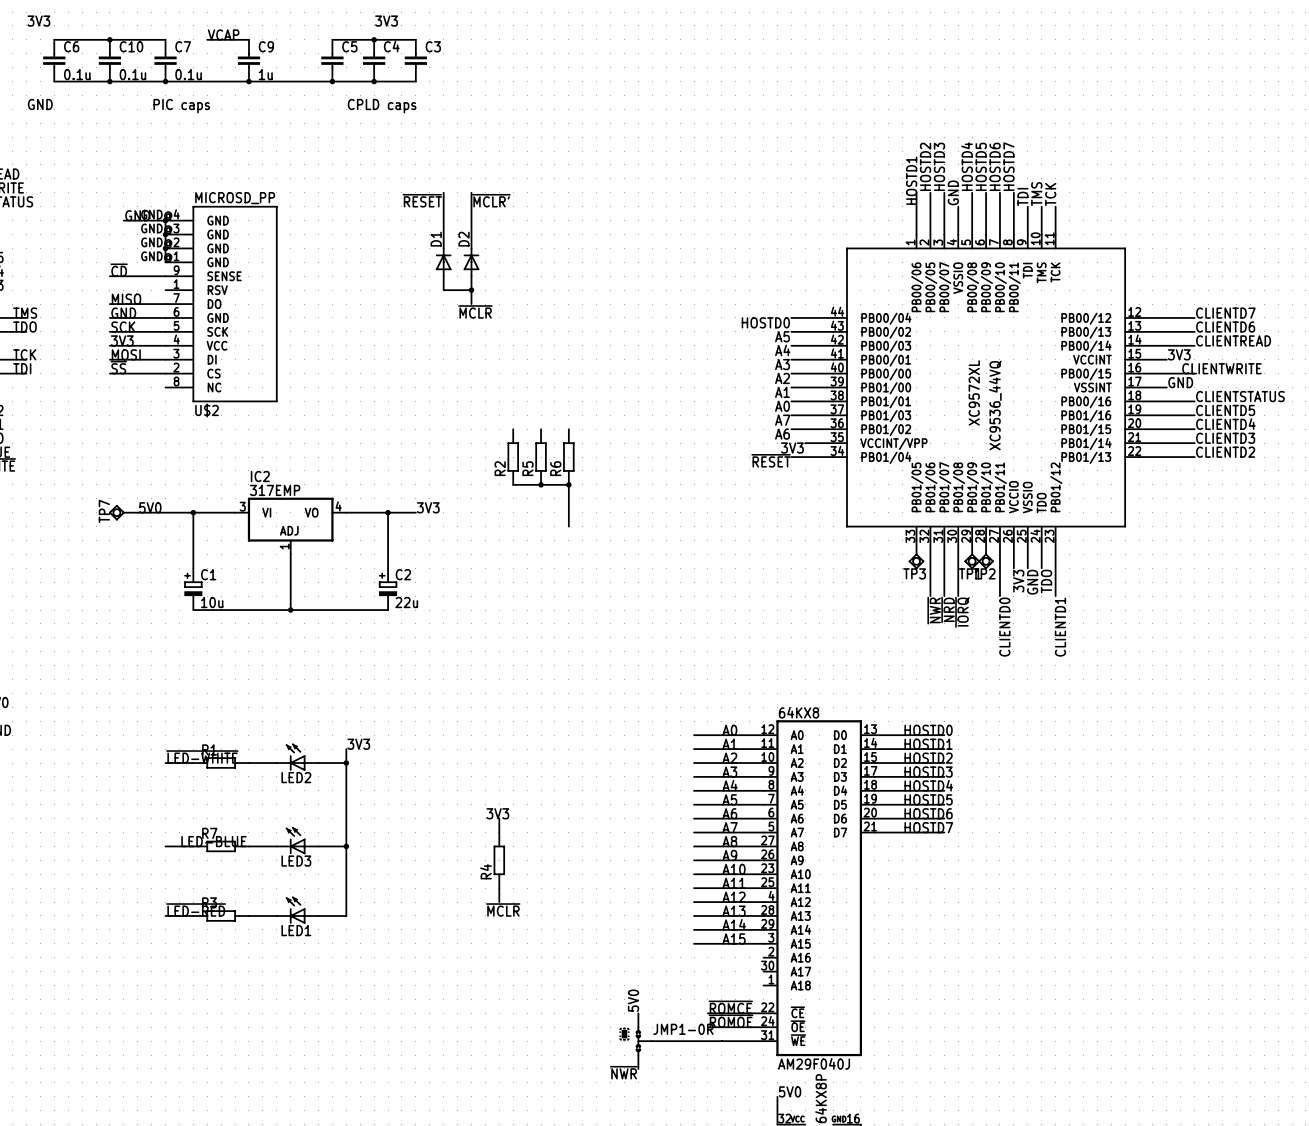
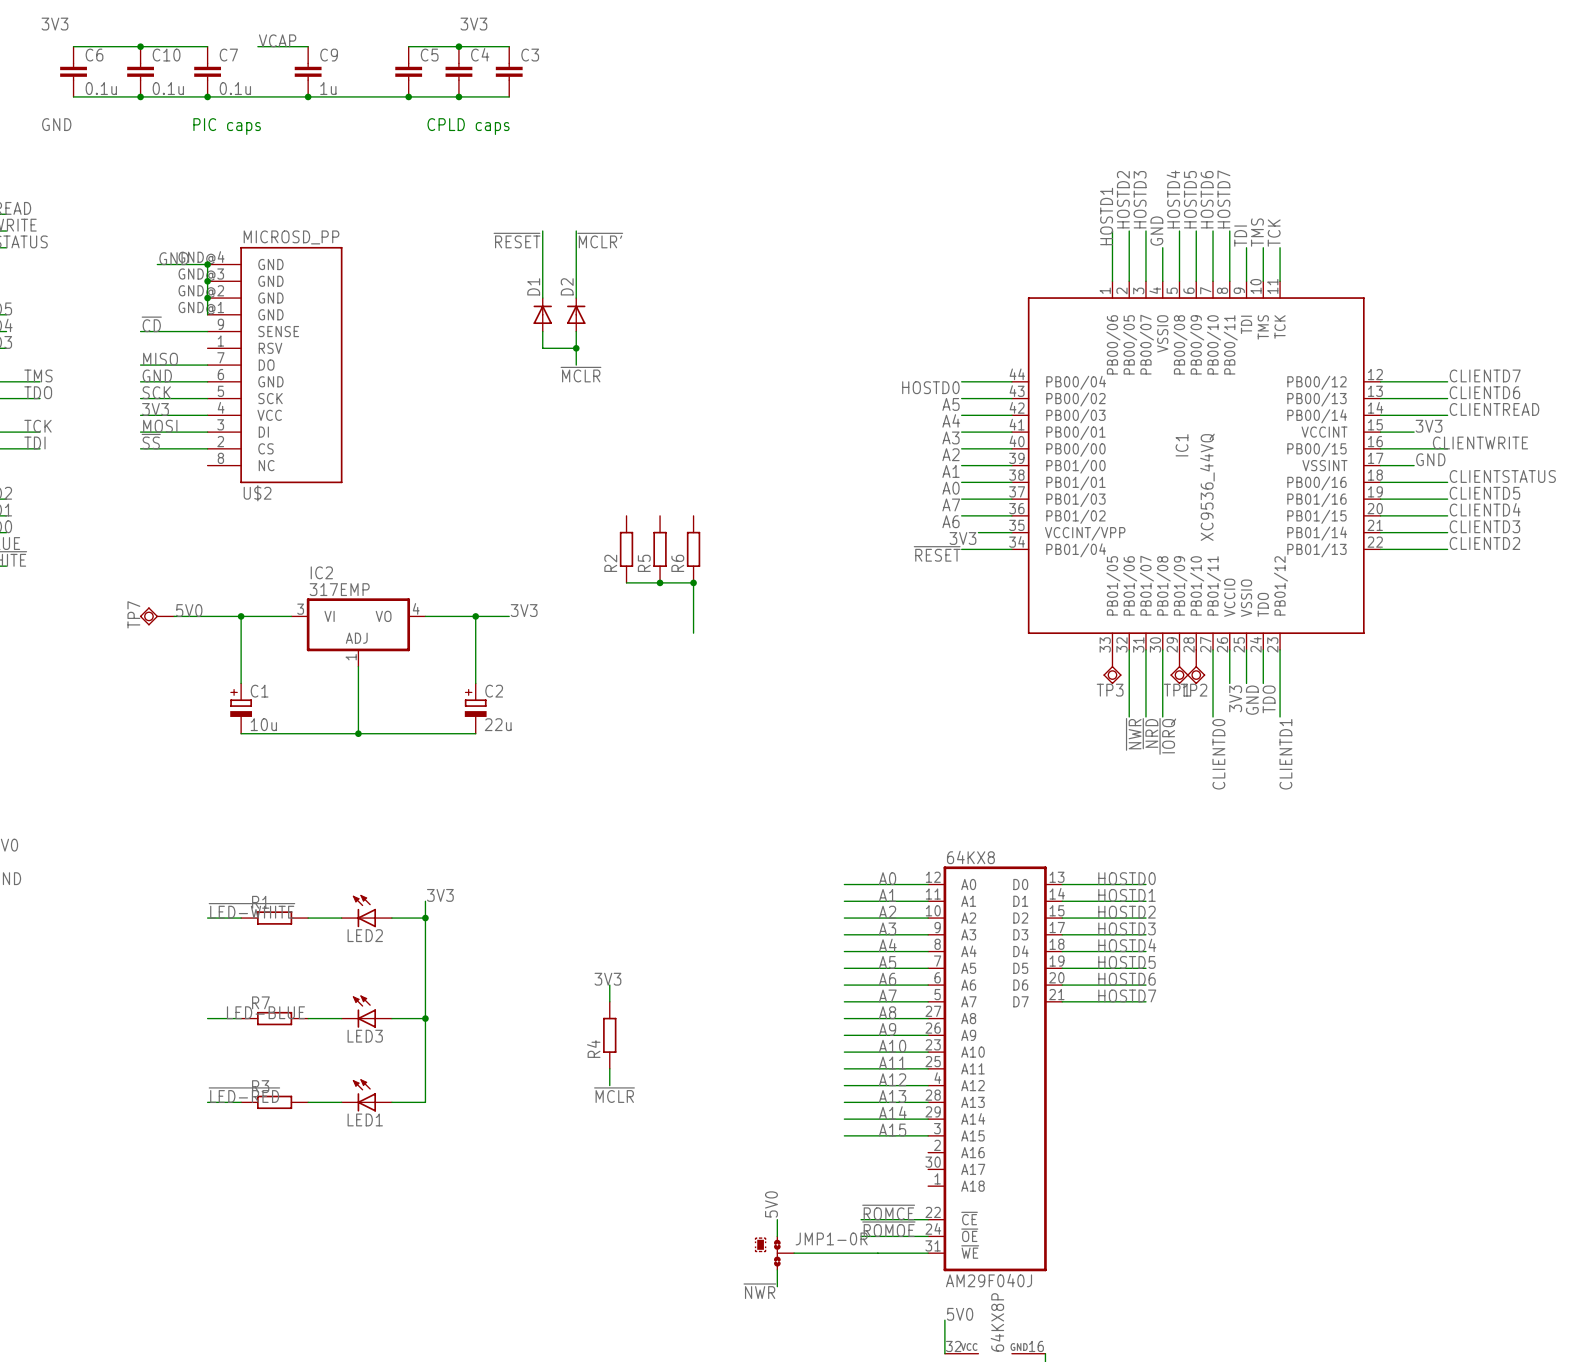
XC9572XL name: XC9572XL (974, 392) -> IC1 (1182, 445)

